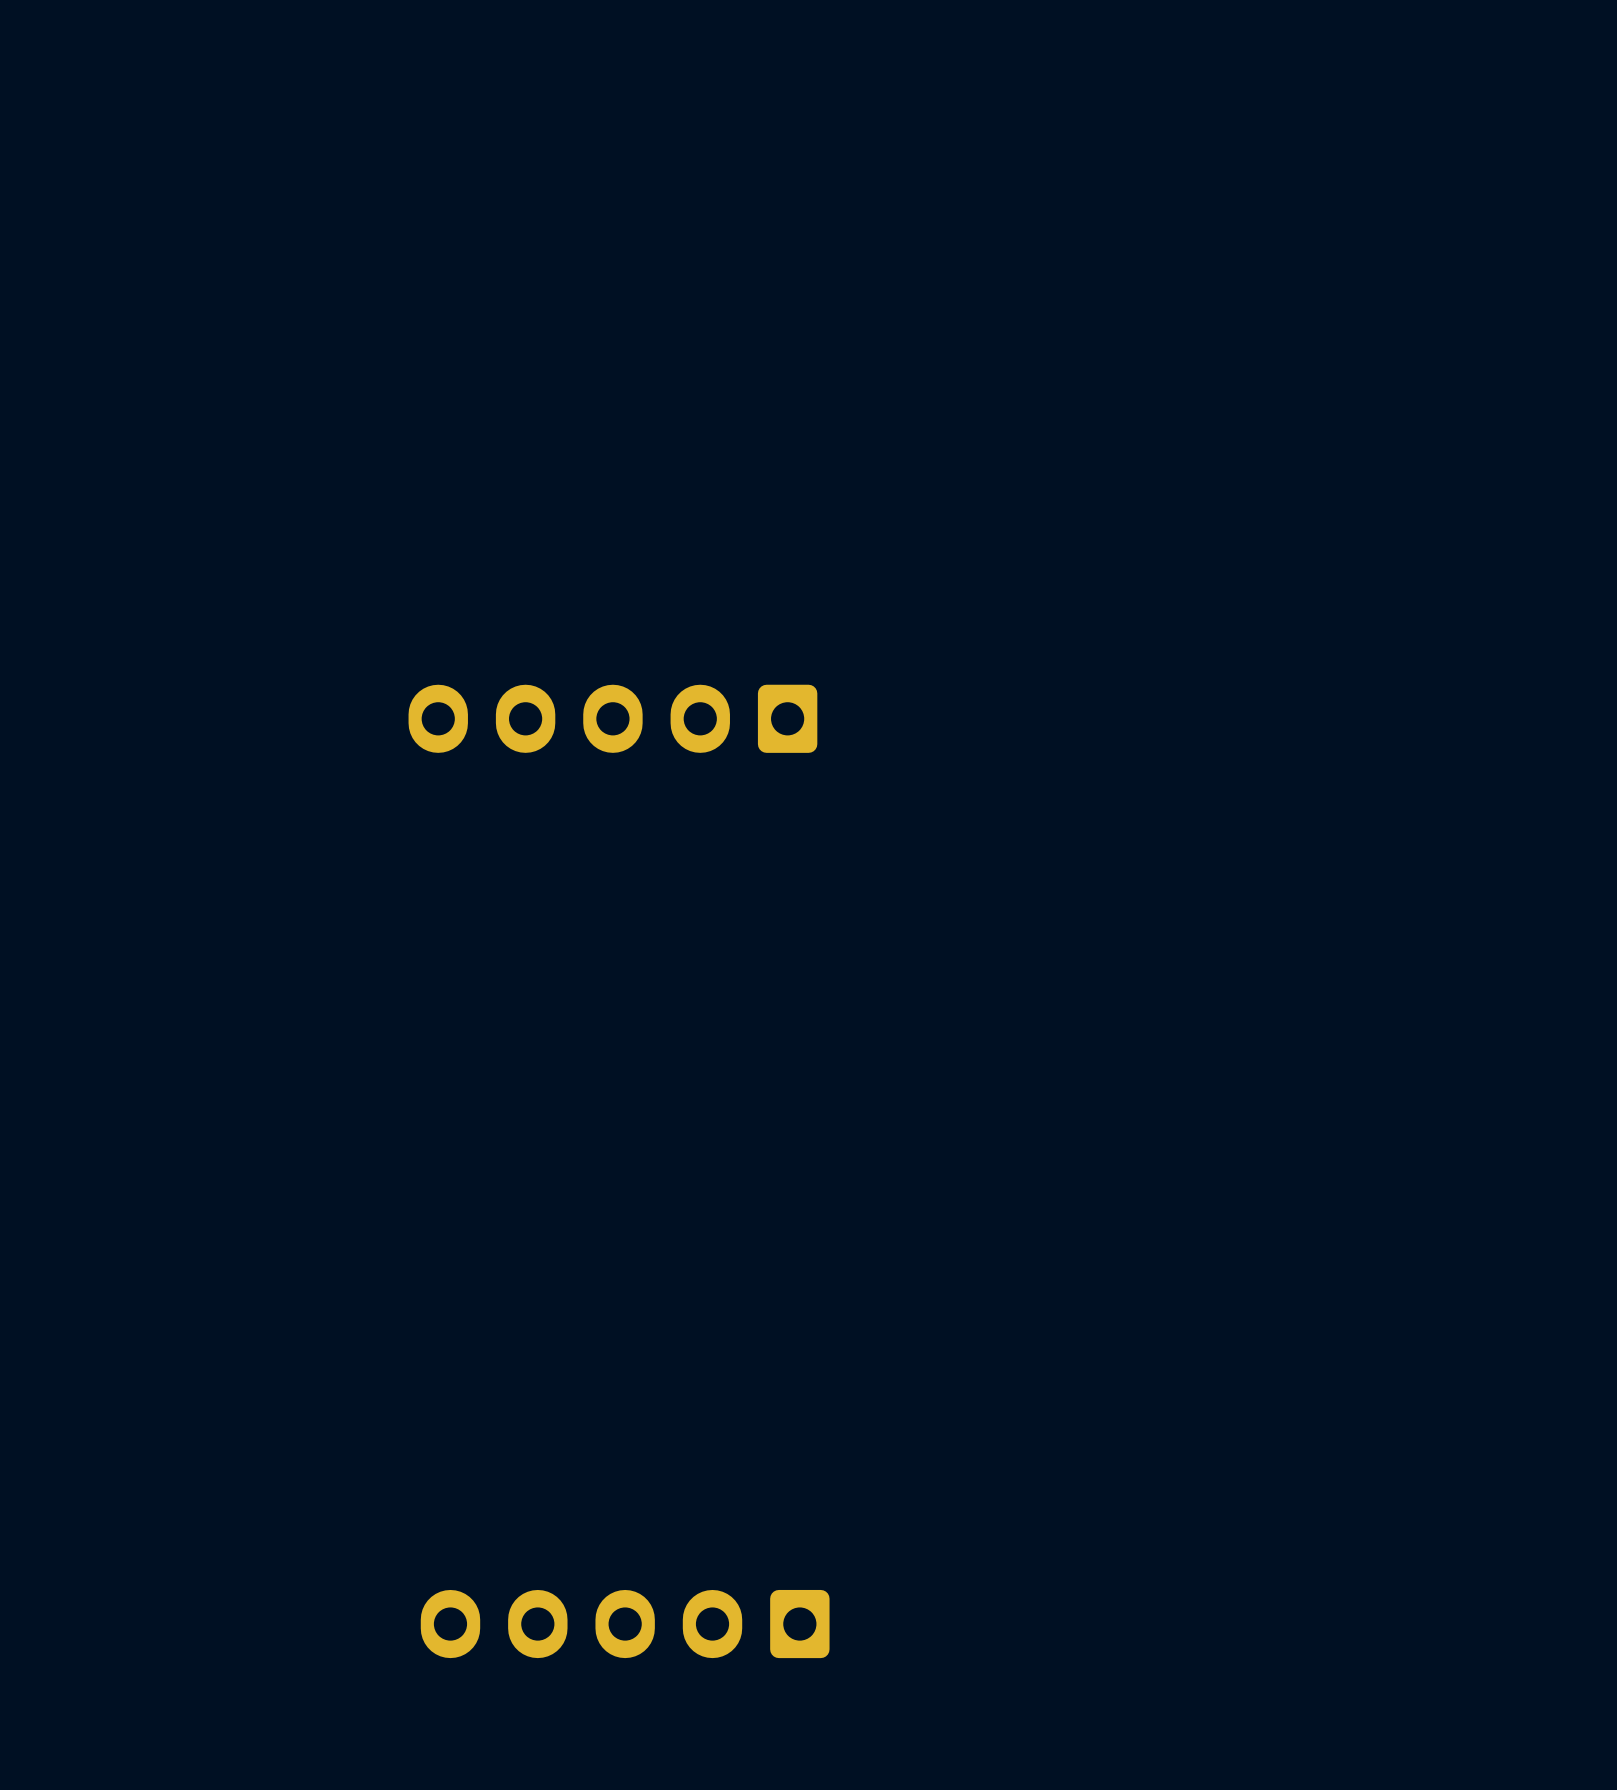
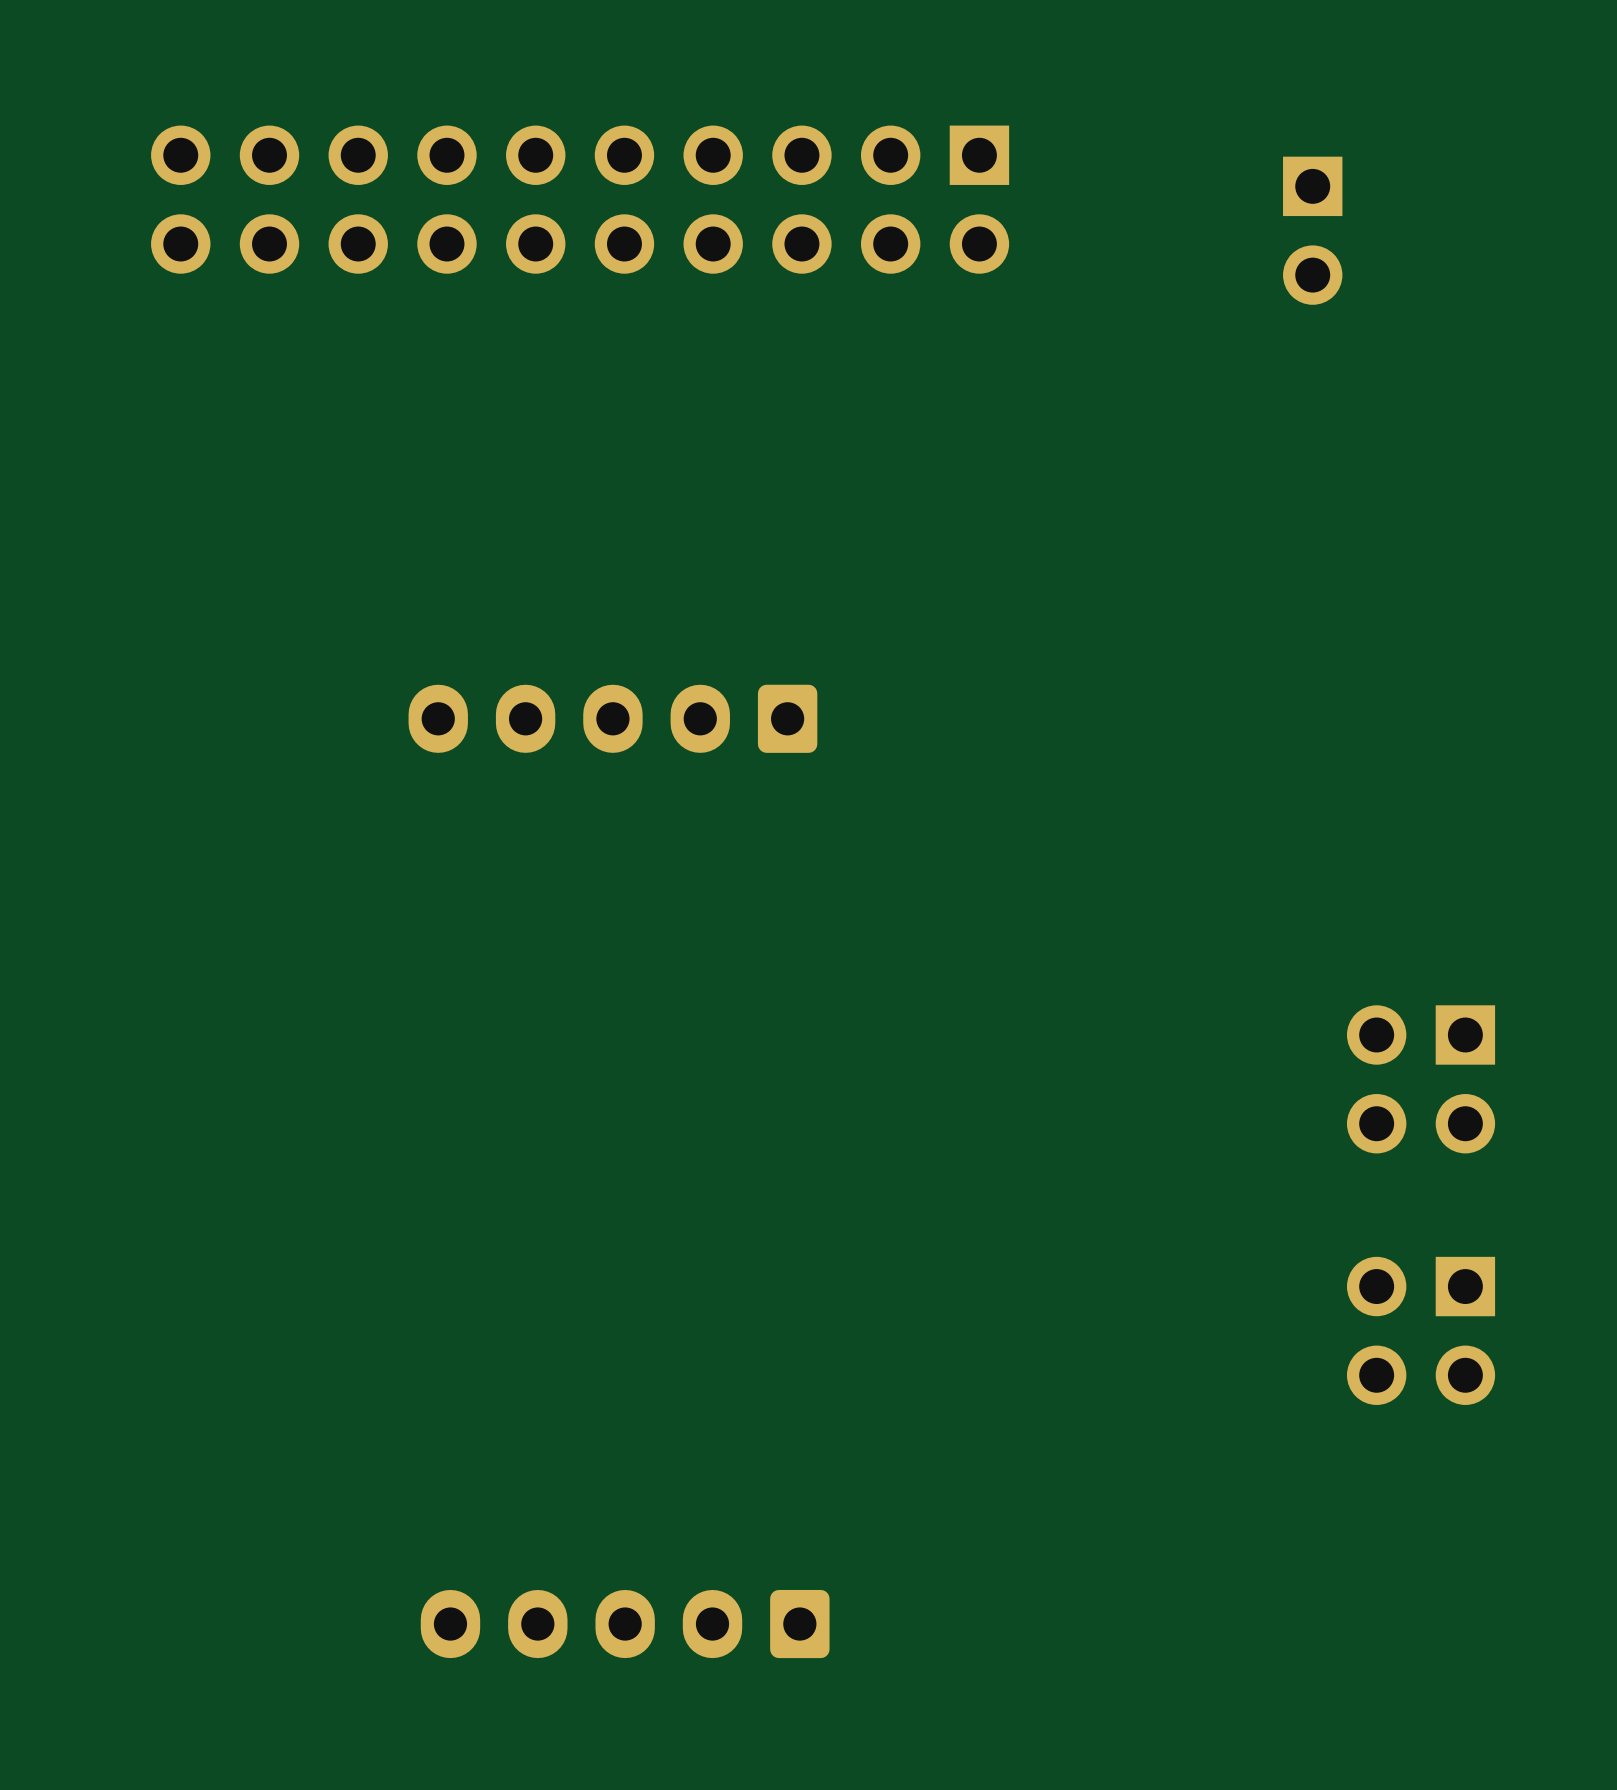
part: none -> (580, 199)
part: none -> (1312, 230)
part: none -> (1421, 1079)
part: none -> (1421, 1330)

